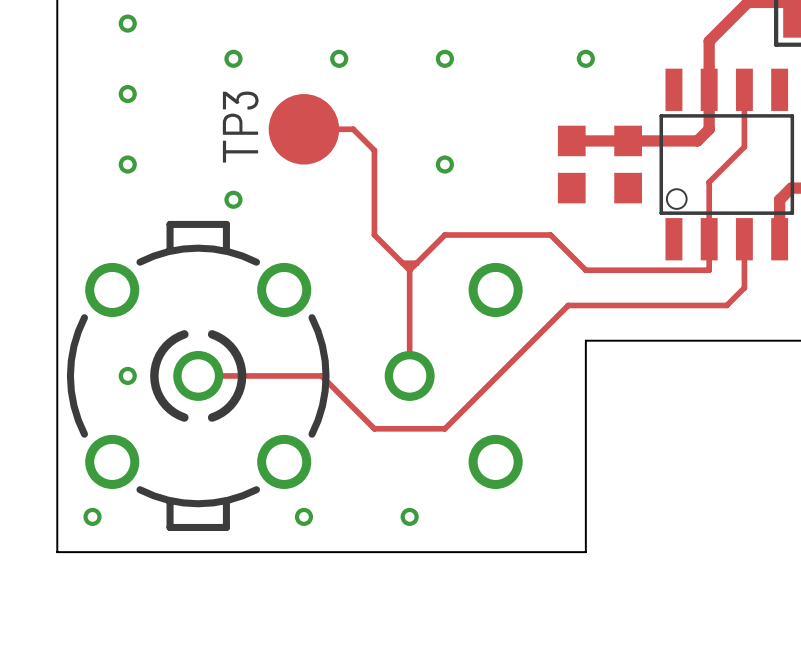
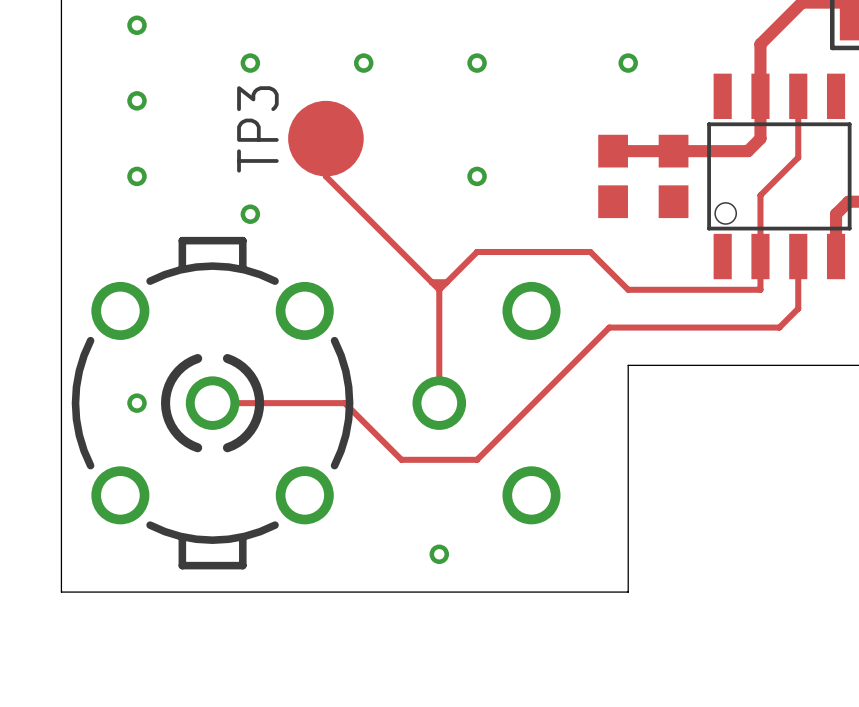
track: (303, 129) (353, 129) (374, 150) (374, 235) -> (325, 138) (325, 176) (401, 251)
via: (92, 516) -> none
via: (303, 516) -> none

